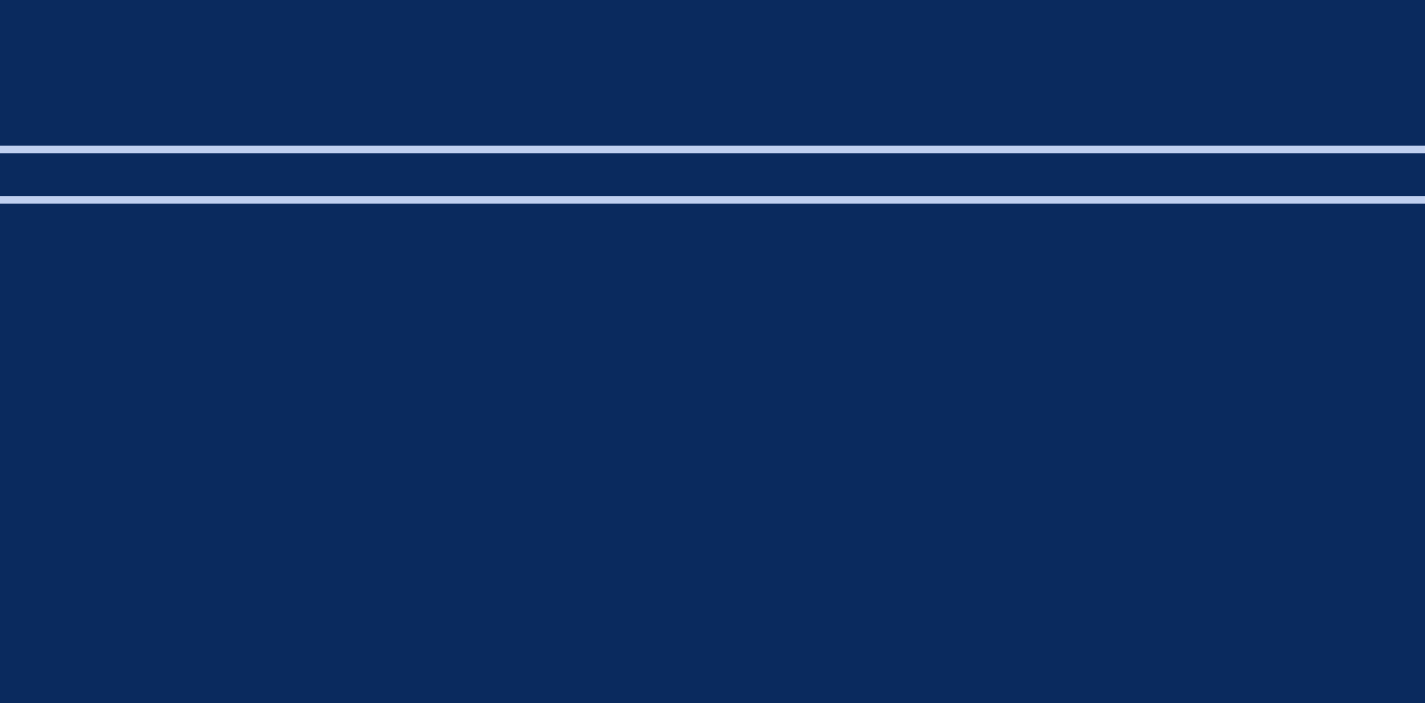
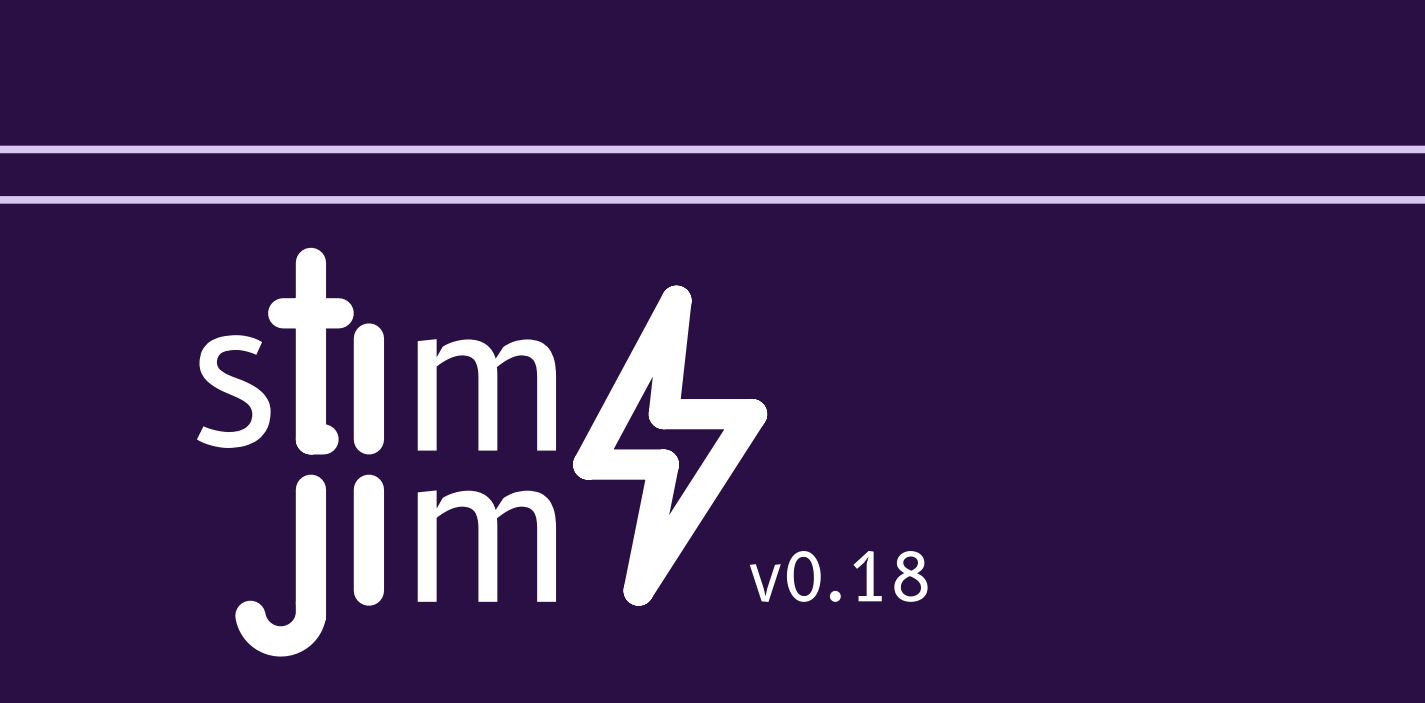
line: none -> (310, 262) (310, 439) (323, 439)
line: none -> (676, 300) (663, 414) (752, 414) (638, 590) (663, 464) (588, 464) (676, 300)
line: none -> (283, 313) (338, 313)
line: none -> (368, 338) (368, 439)
text: none -> s (233, 391)
text: none -> m (486, 394)
line: none -> (310, 489) (310, 615)
line: none -> (368, 489) (368, 590)
text: none -> m (486, 546)
text: none -> v0.18 (838, 576)
line: none -> (250, 615) (259, 632) (268, 639) (280, 641) (298, 635) (306, 627) (310, 616)

